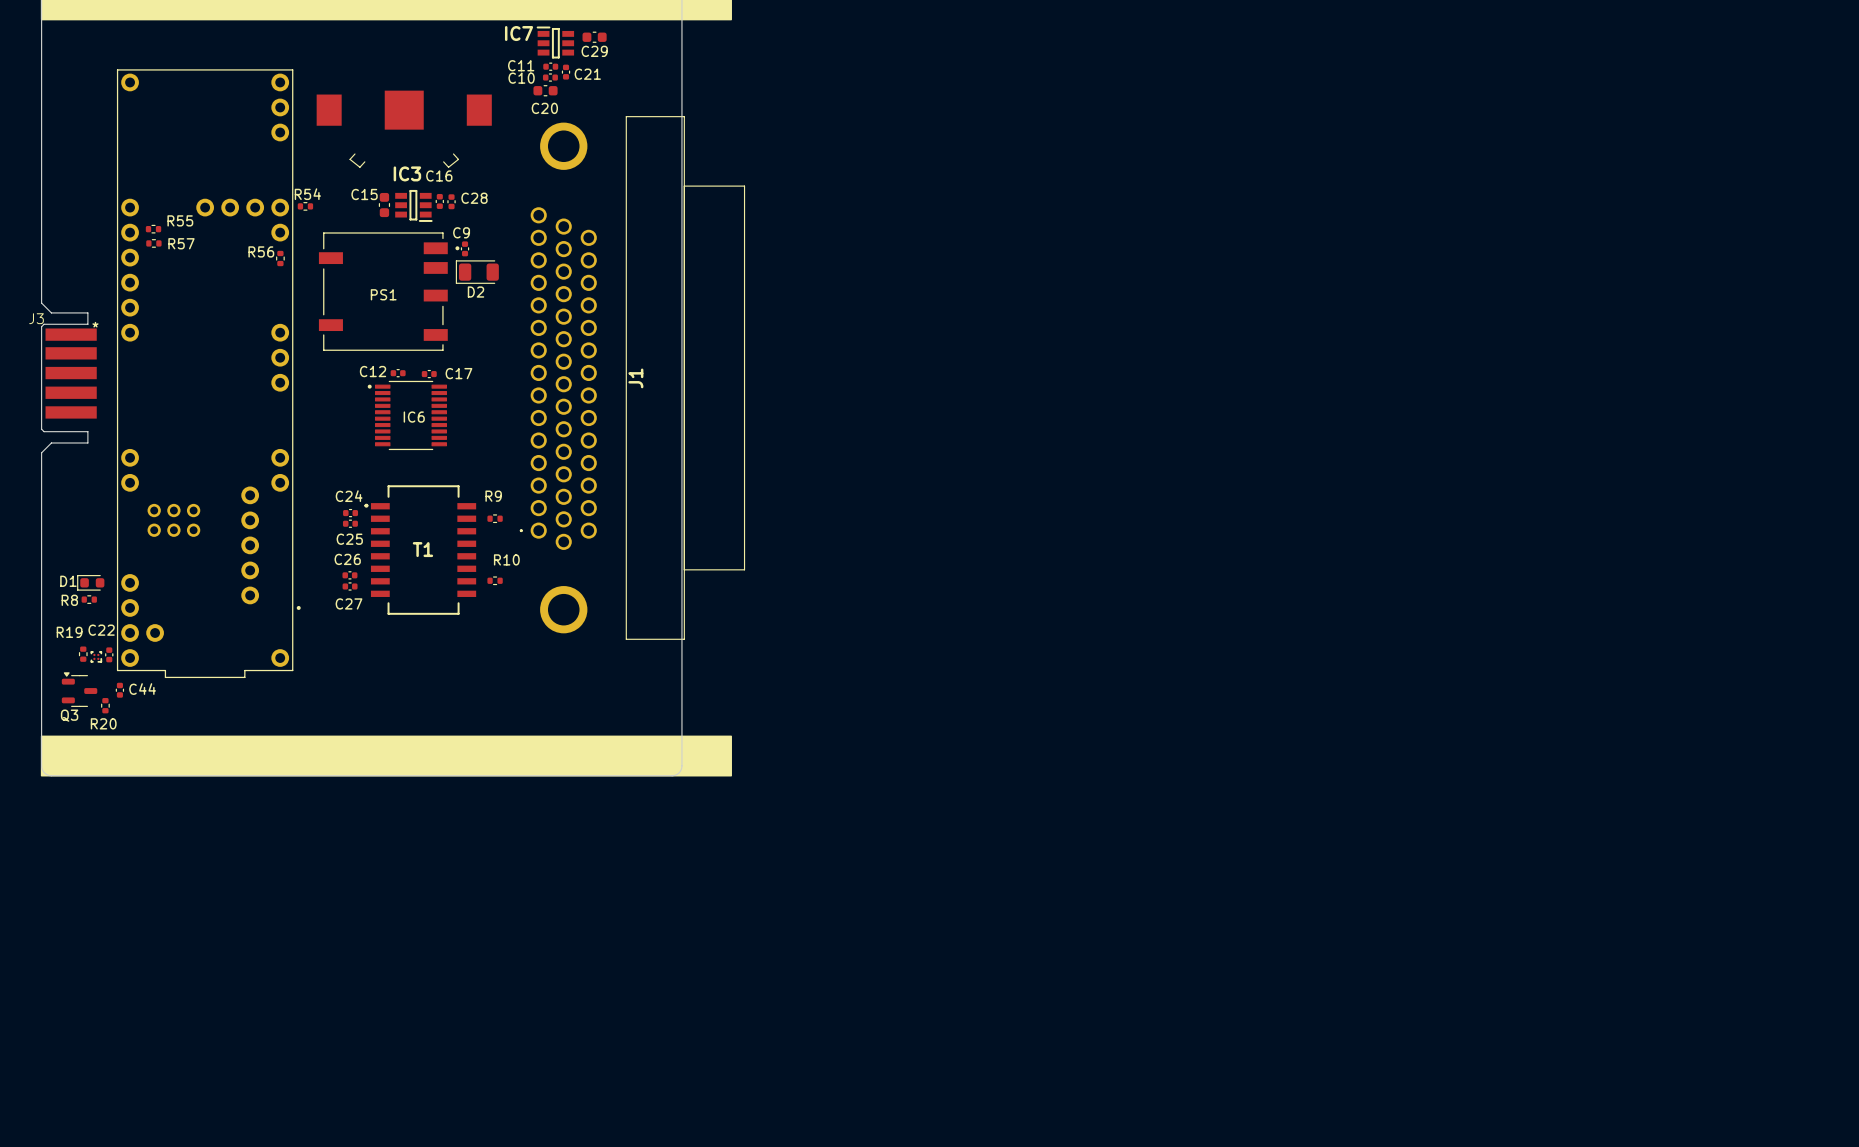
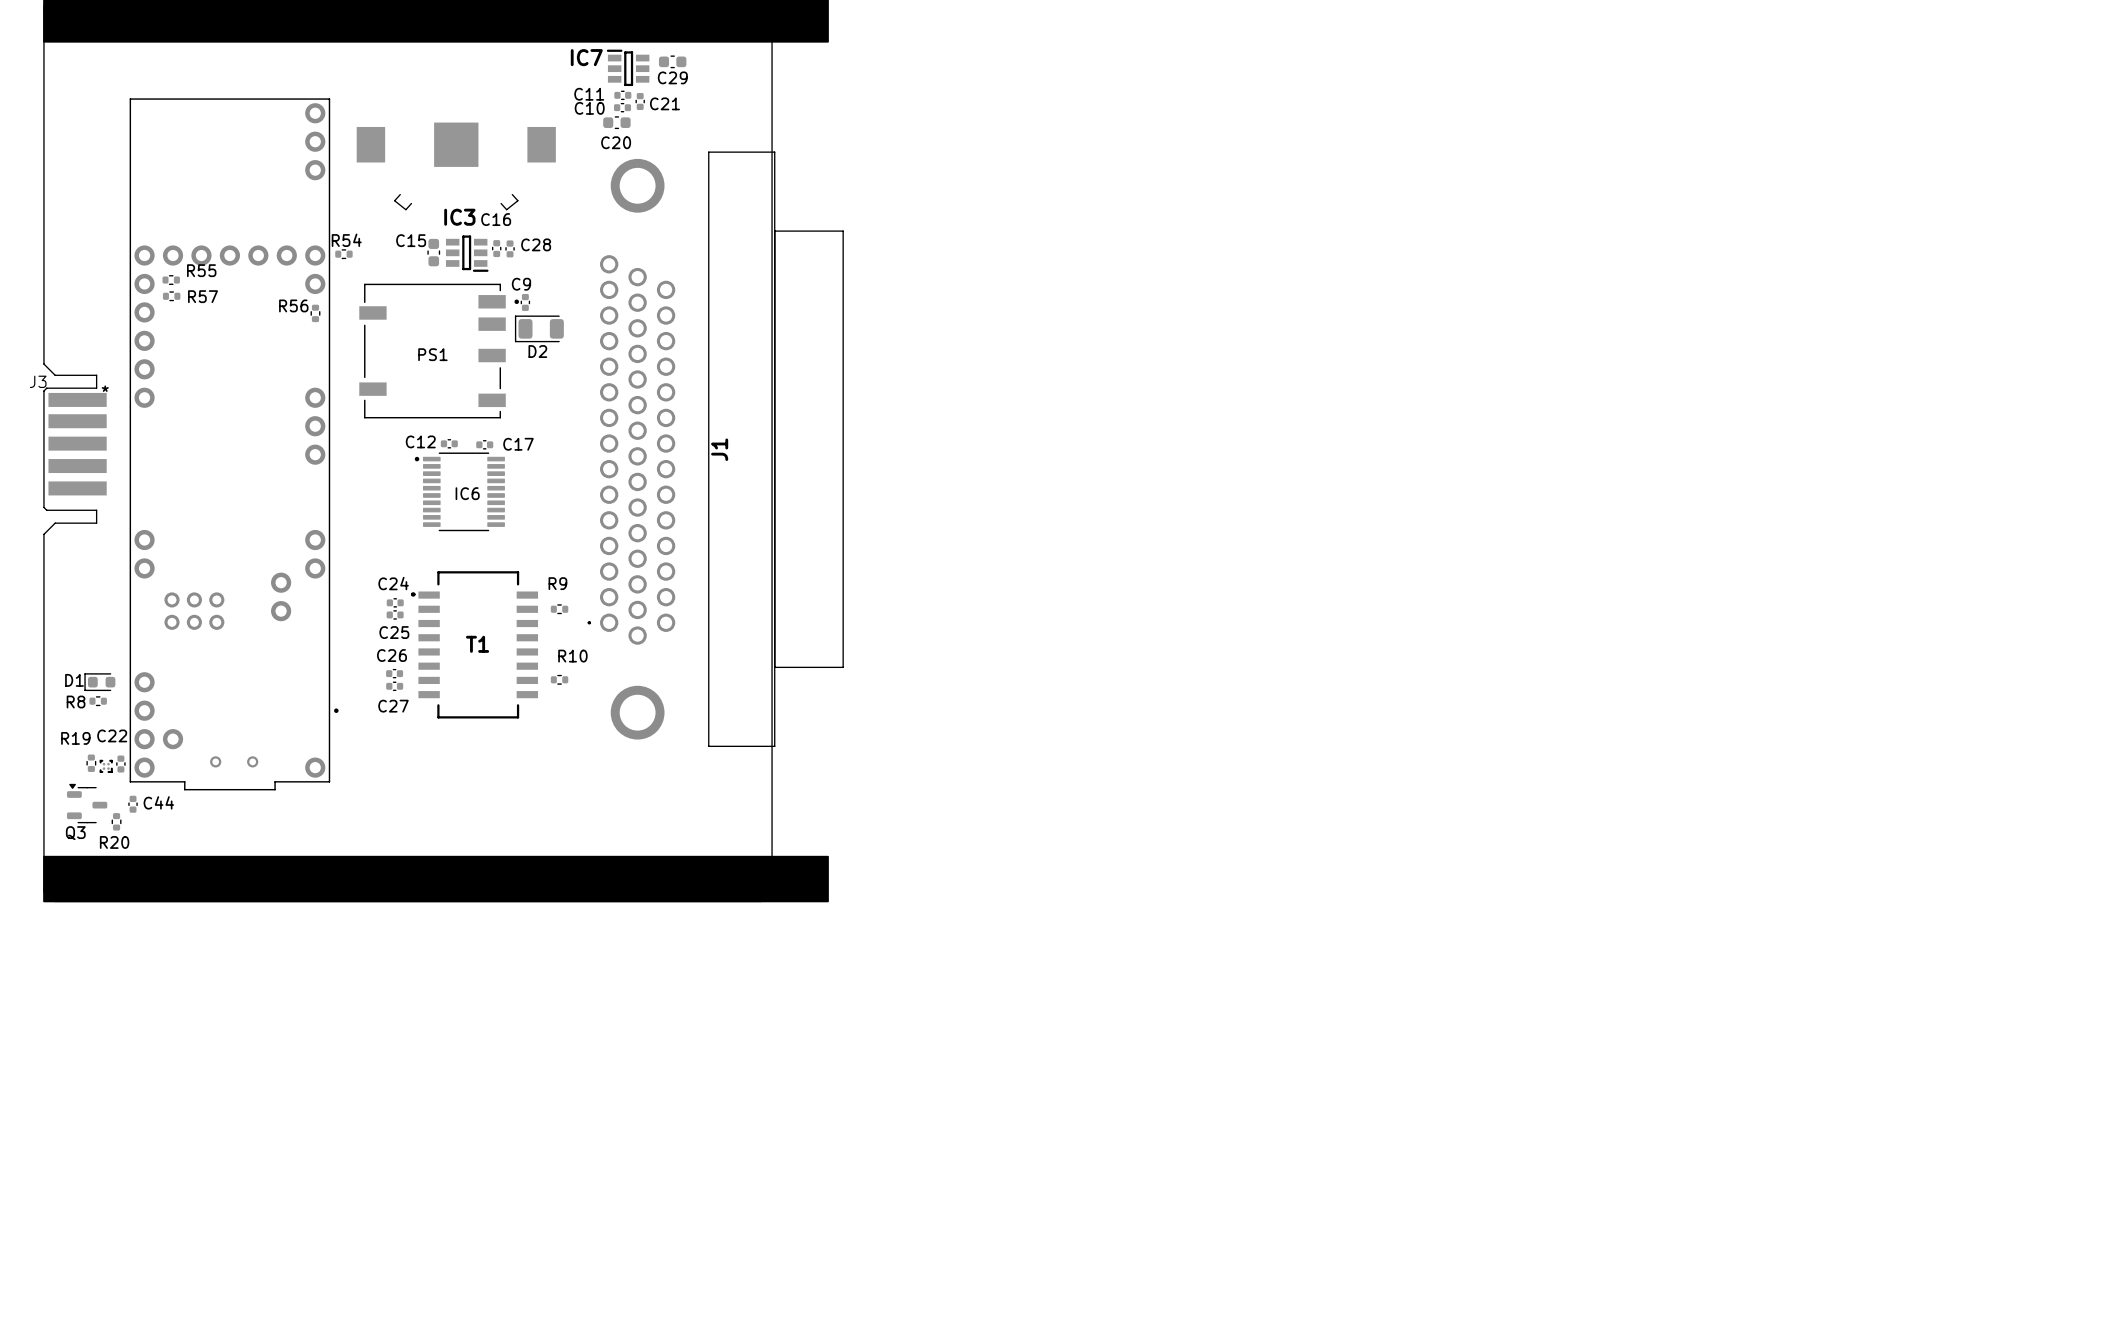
part footprint: [116, 69, 301, 679] -> [129, 98, 339, 791]

